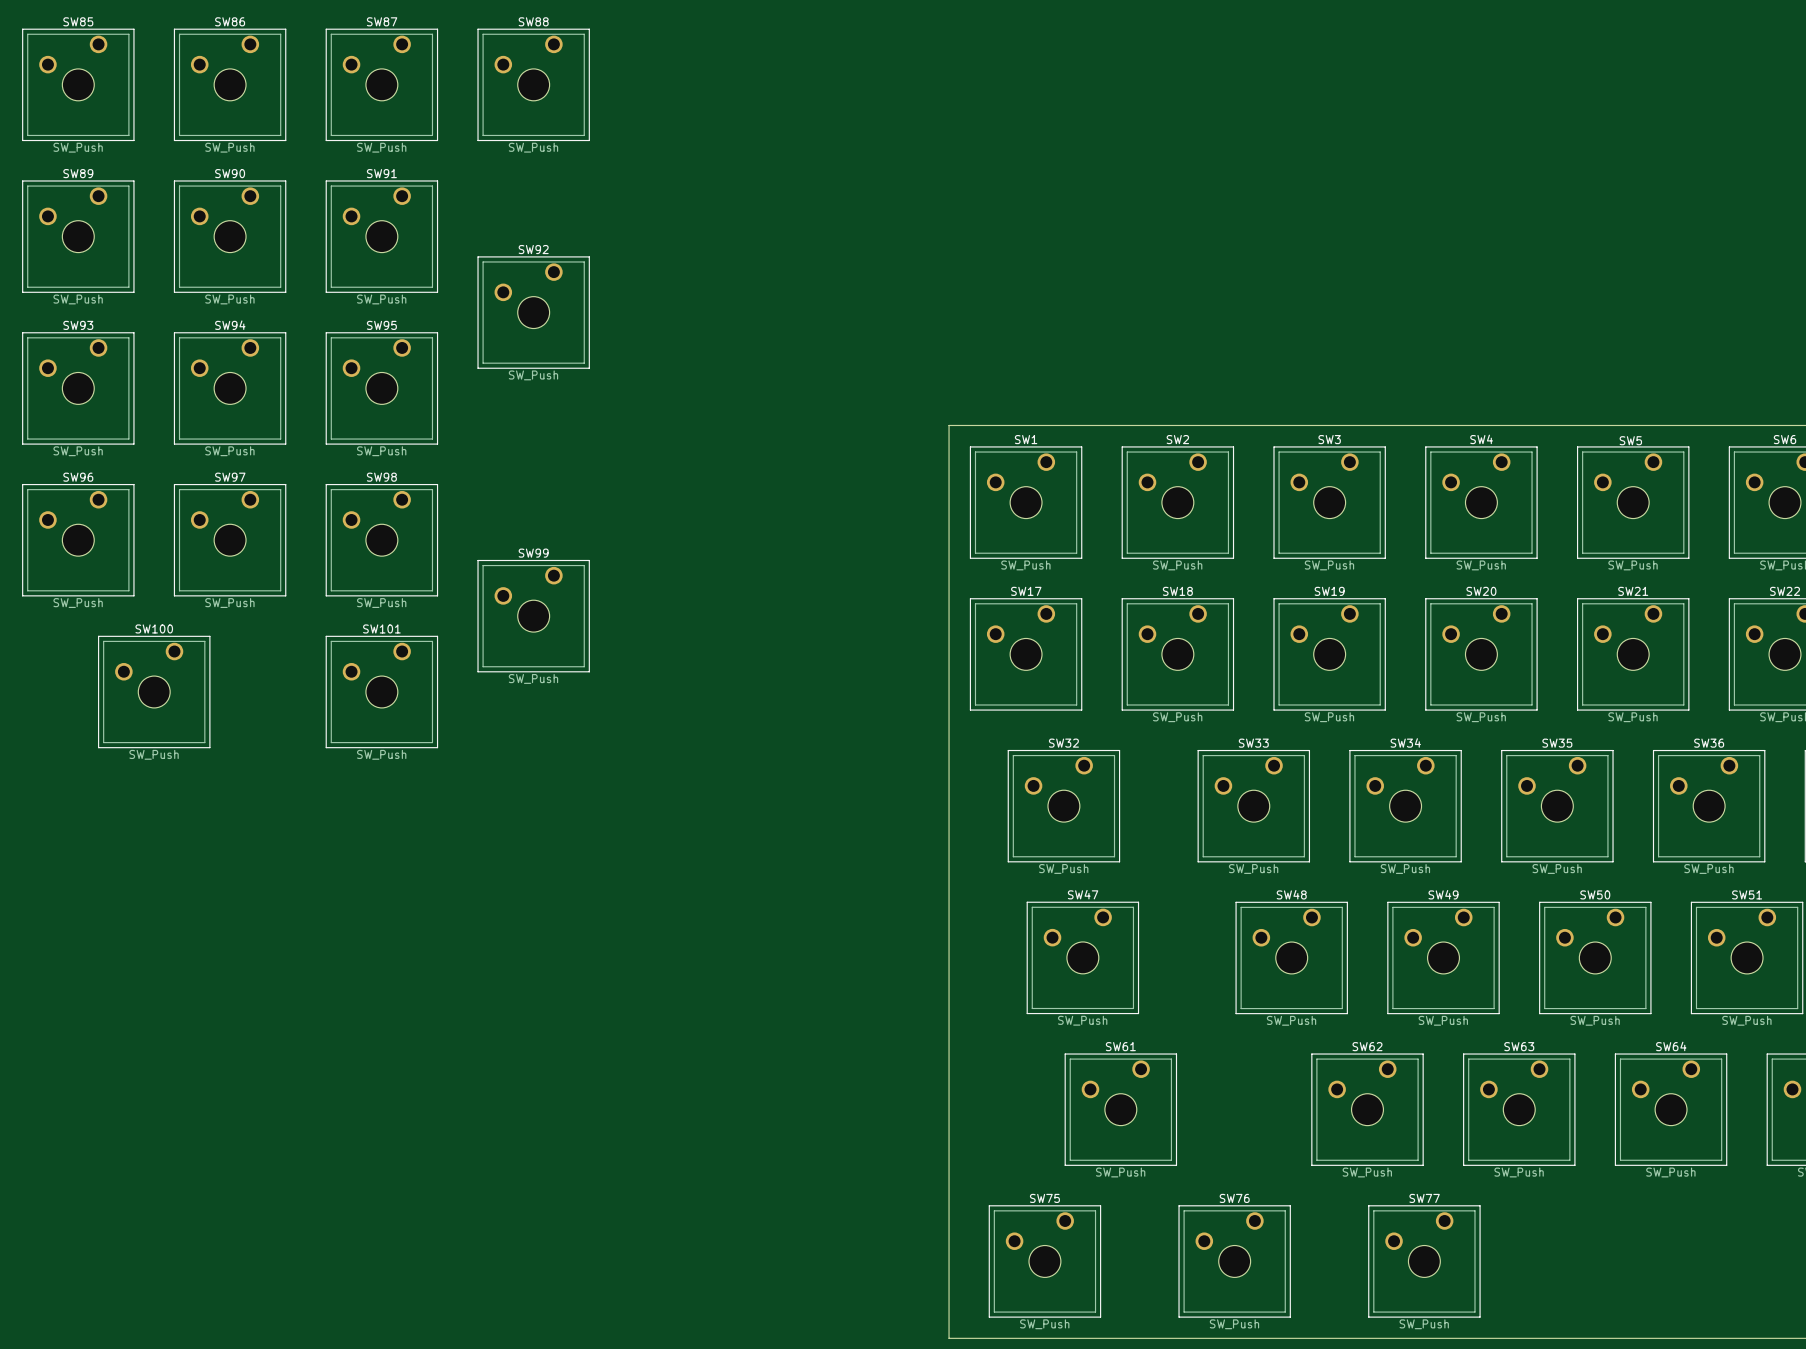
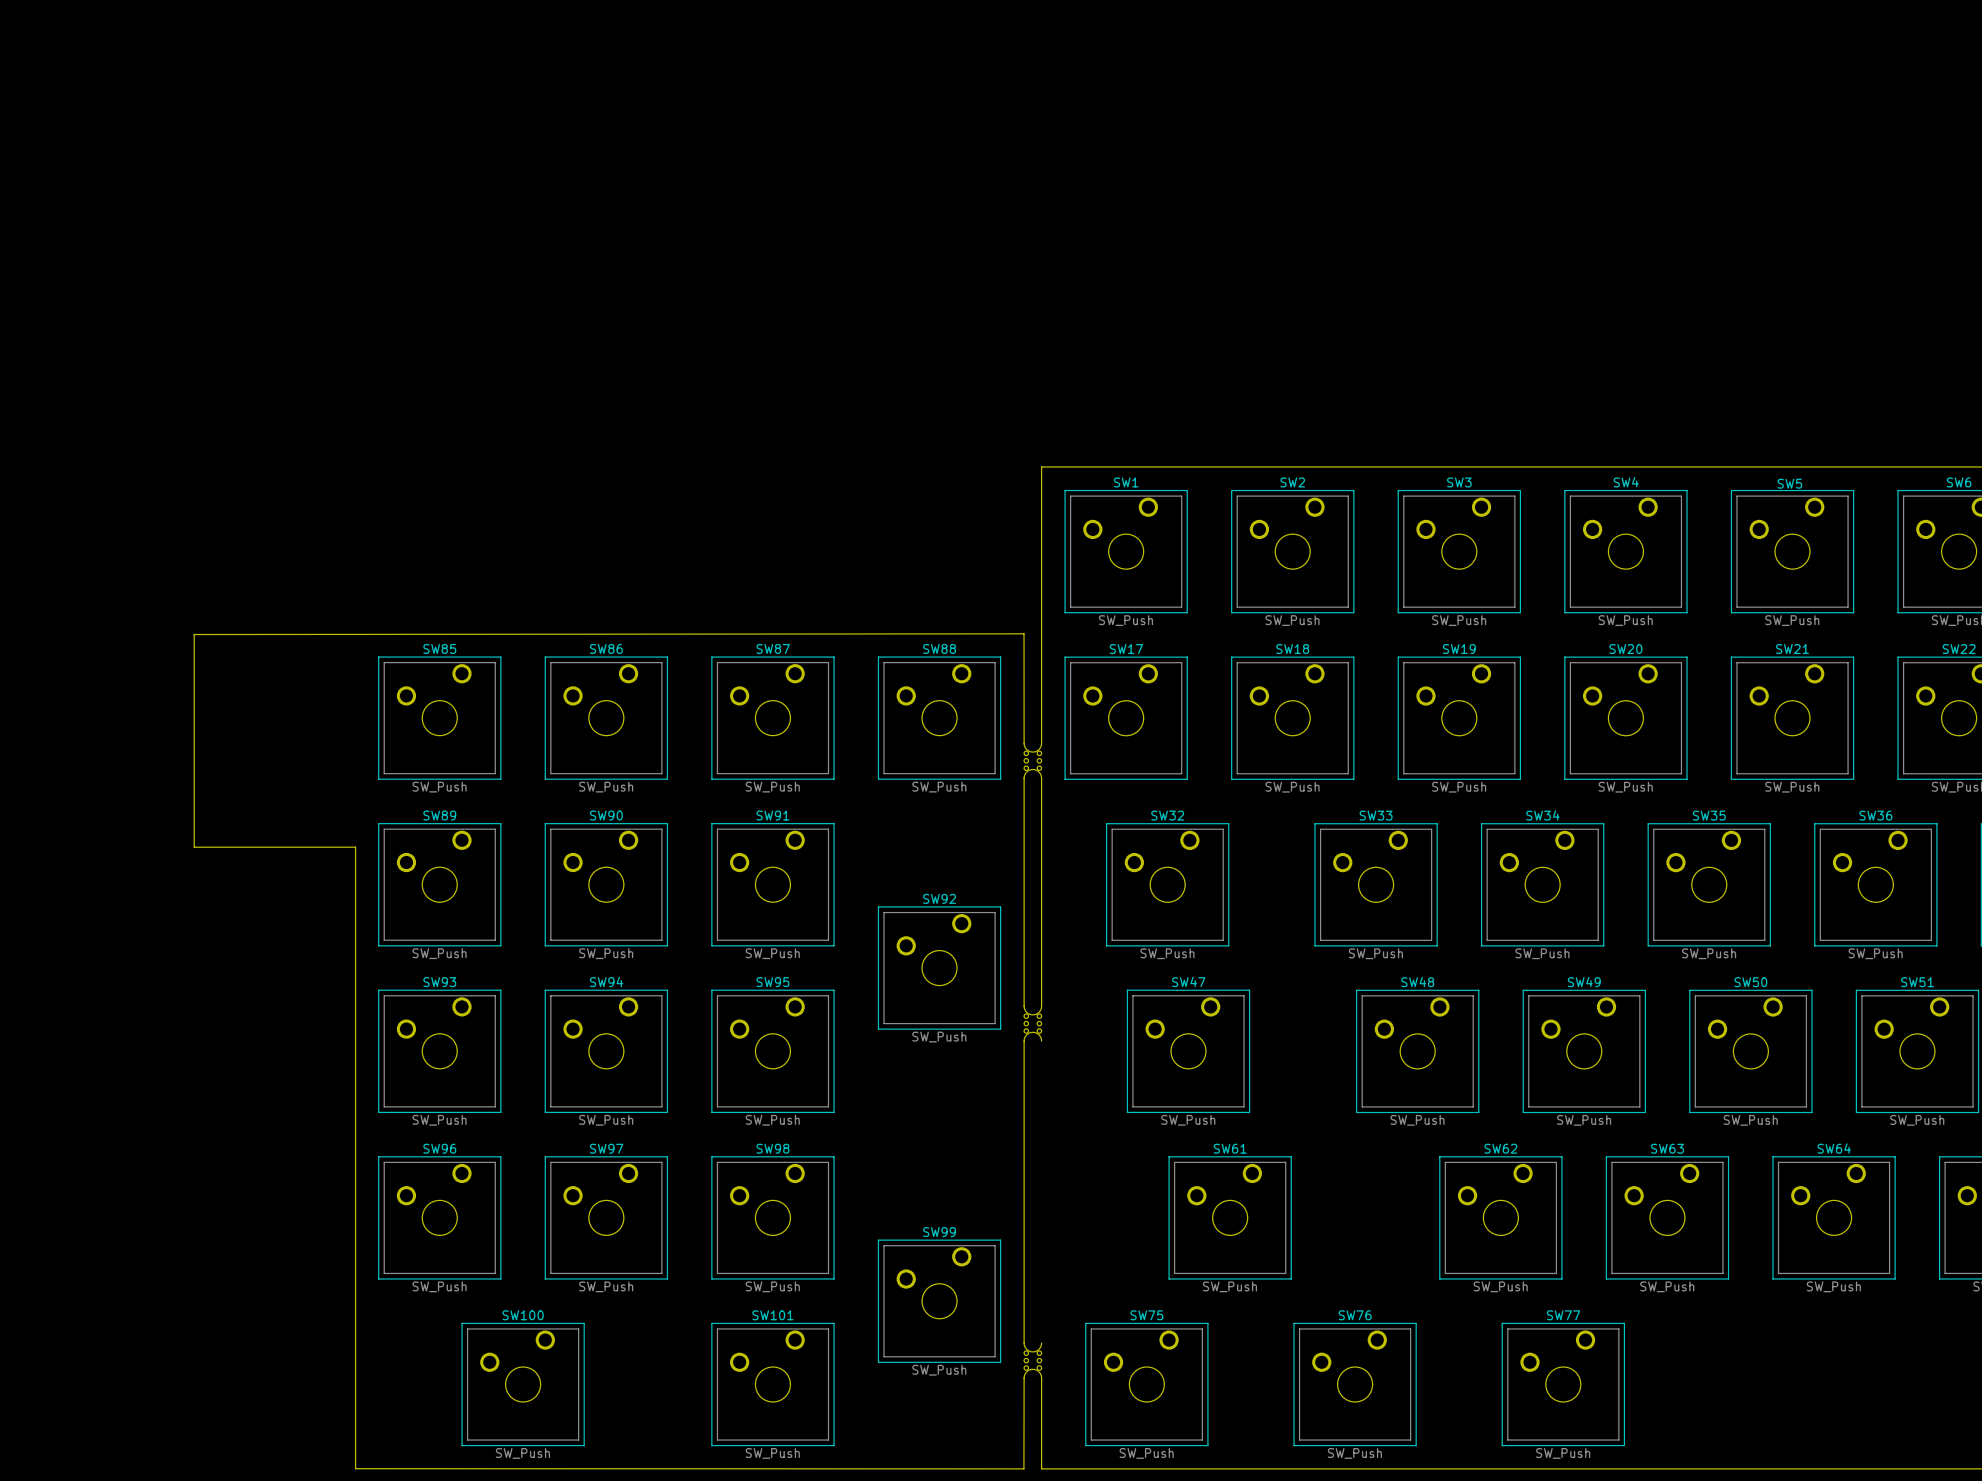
SW85 position: (78, 84) -> (439, 718)
SW86 position: (230, 84) -> (606, 718)
SW87 position: (381, 84) -> (772, 718)
SW88 position: (533, 84) -> (939, 718)
SW89 position: (78, 236) -> (439, 884)
SW90 position: (230, 236) -> (606, 884)
SW91 position: (381, 236) -> (772, 884)
SW92 position: (533, 312) -> (939, 968)
SW93 position: (78, 388) -> (439, 1051)
SW94 position: (230, 388) -> (606, 1051)
SW95 position: (381, 388) -> (772, 1051)
SW96 position: (78, 540) -> (439, 1217)
SW97 position: (230, 540) -> (606, 1217)
SW98 position: (381, 540) -> (772, 1217)
SW99 position: (533, 616) -> (939, 1301)
board edge: none -> (1024, 743) (1024, 633) (194, 634) (194, 847) (355, 847) (355, 1468) (1023, 1468) (1024, 1378)
board edge: (949, 677) (949, 709) -> none
SW100 position: (154, 692) -> (523, 1384)
SW101 position: (381, 692) -> (772, 1384)
part: none -> (1032, 760)
board edge: none -> (1024, 778) (1024, 1006)
board edge: (949, 916) (949, 1338) -> (1041, 1378) (1041, 1468)
part: none -> (1032, 1023)
board edge: none -> (1024, 1041) (1024, 1343)
part: none -> (1032, 1360)

